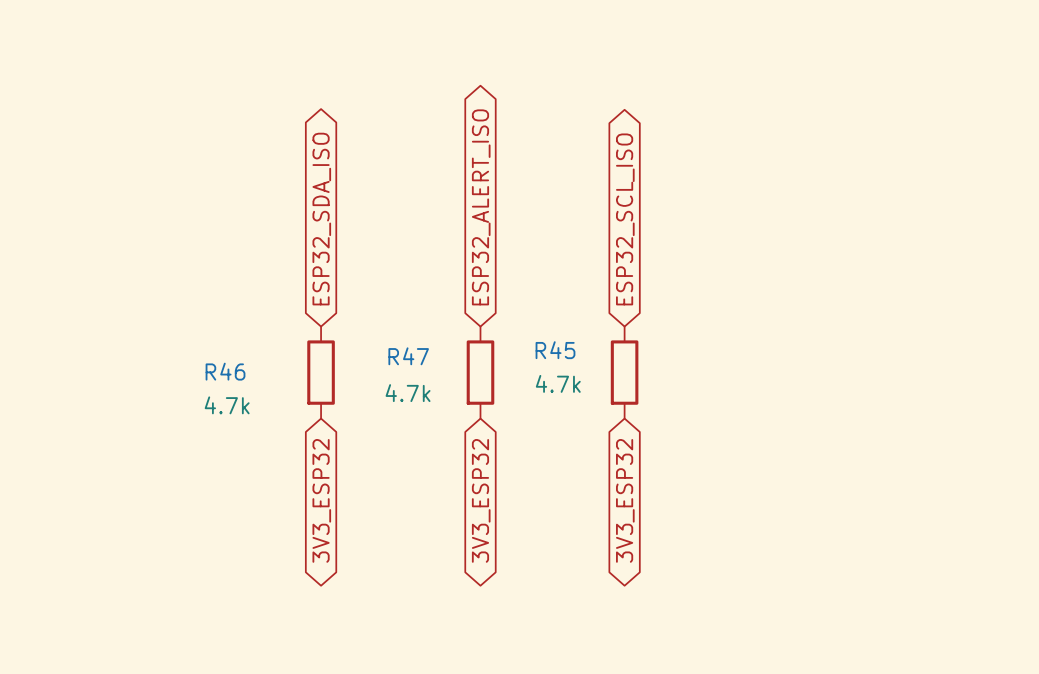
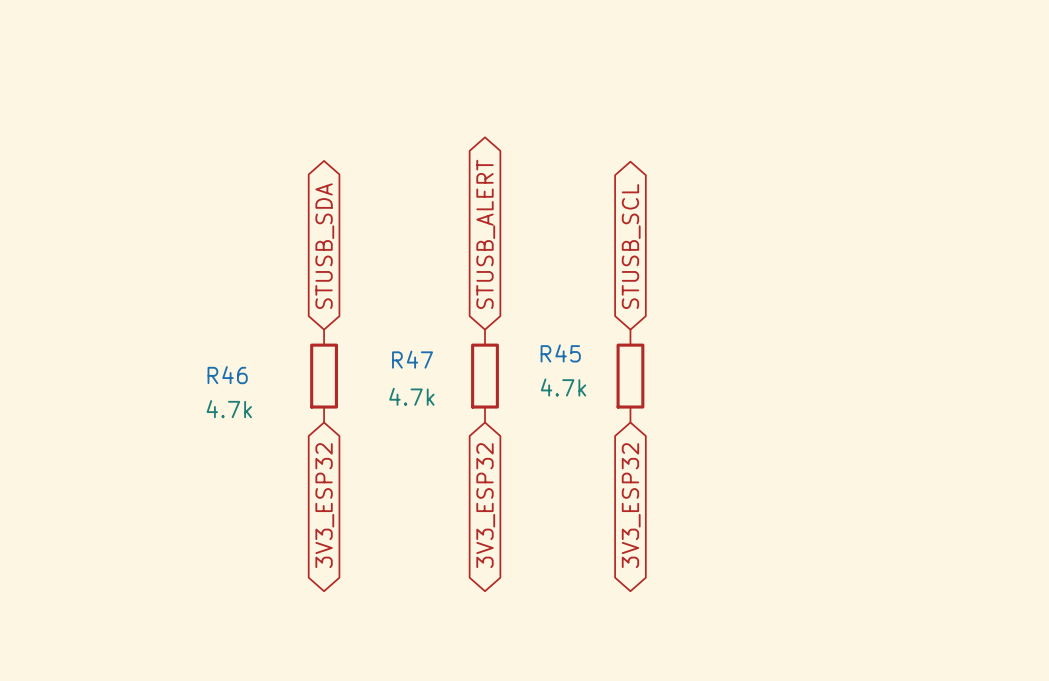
global label: ESP32_ALERT_ISO (481, 207) -> STUSB_ALERT (485, 234)
global label: ESP32_SDA_ISO (321, 219) -> STUSB_SDA (324, 246)
global label: ESP32_SCL_ISO (625, 219) -> STUSB_SCL (631, 246)

